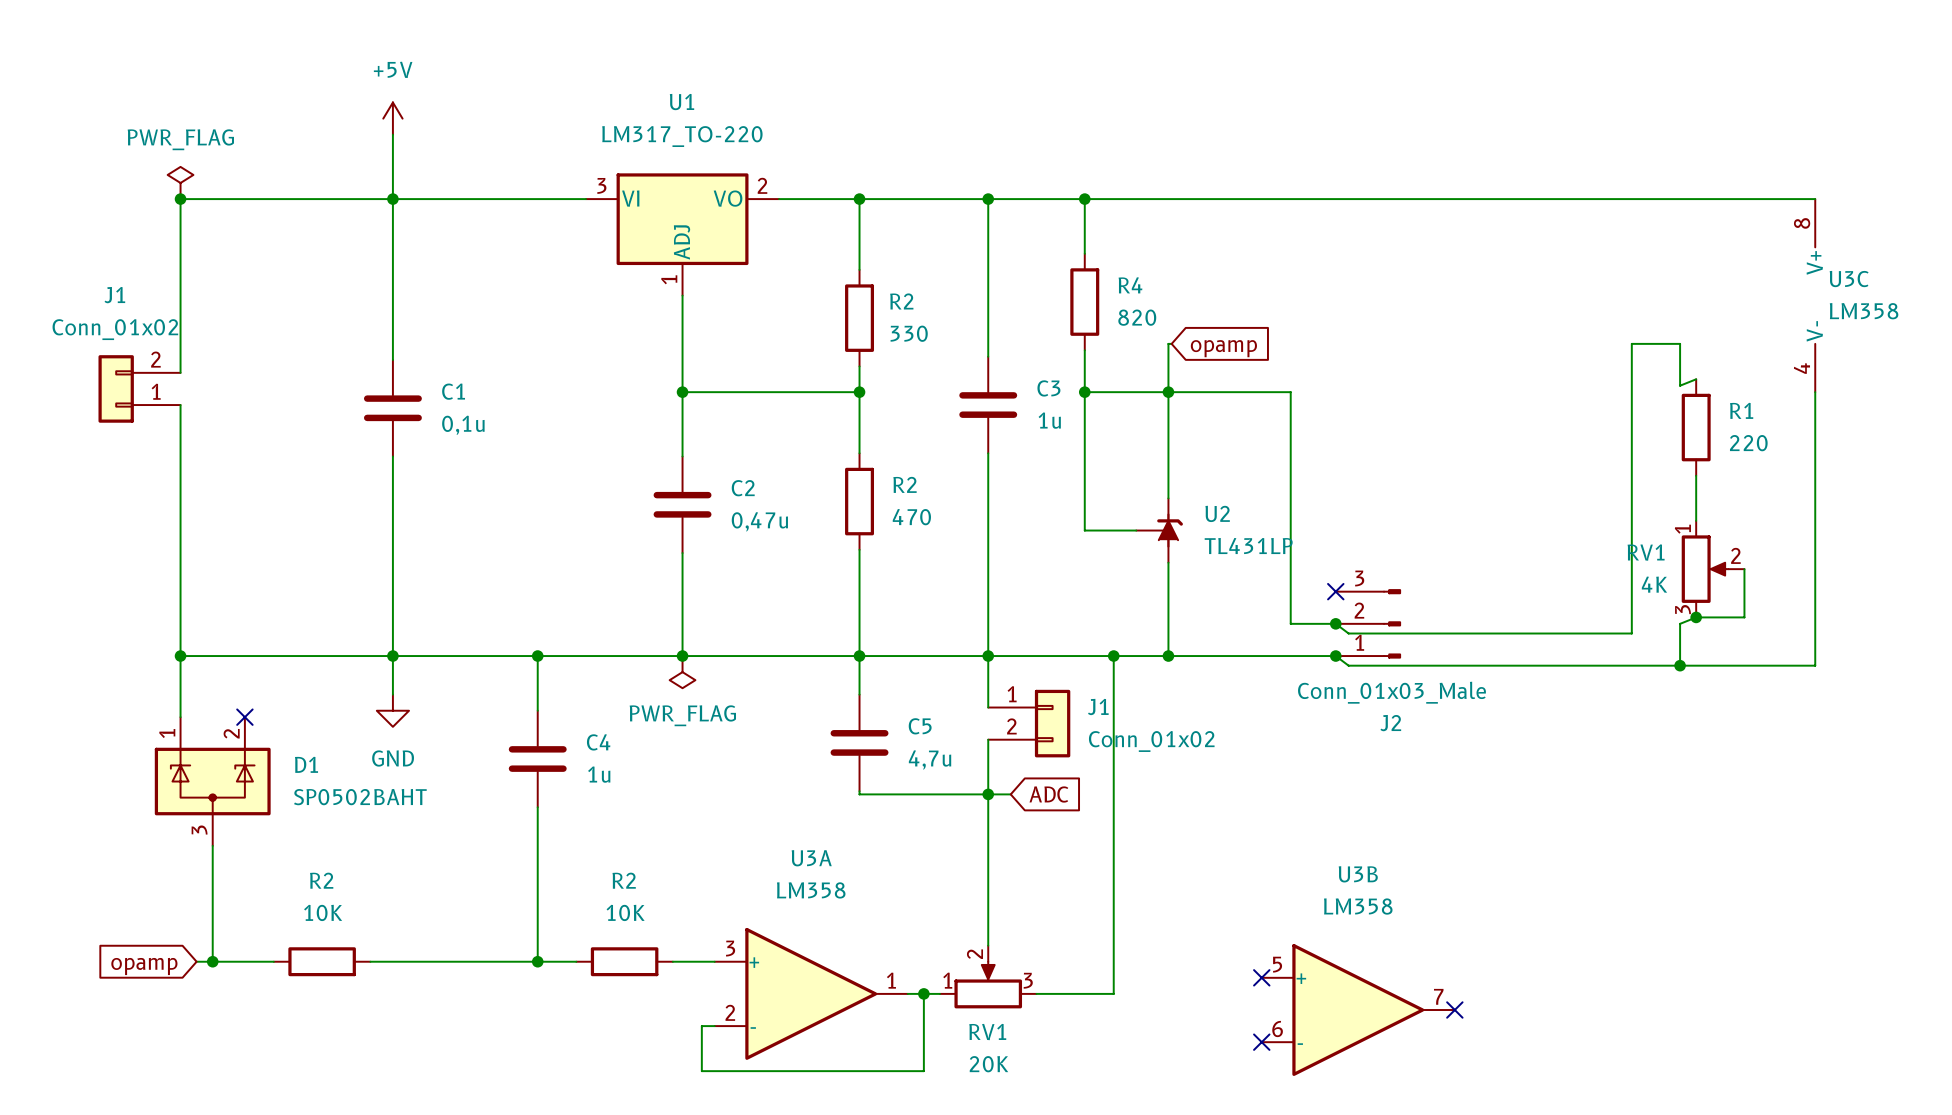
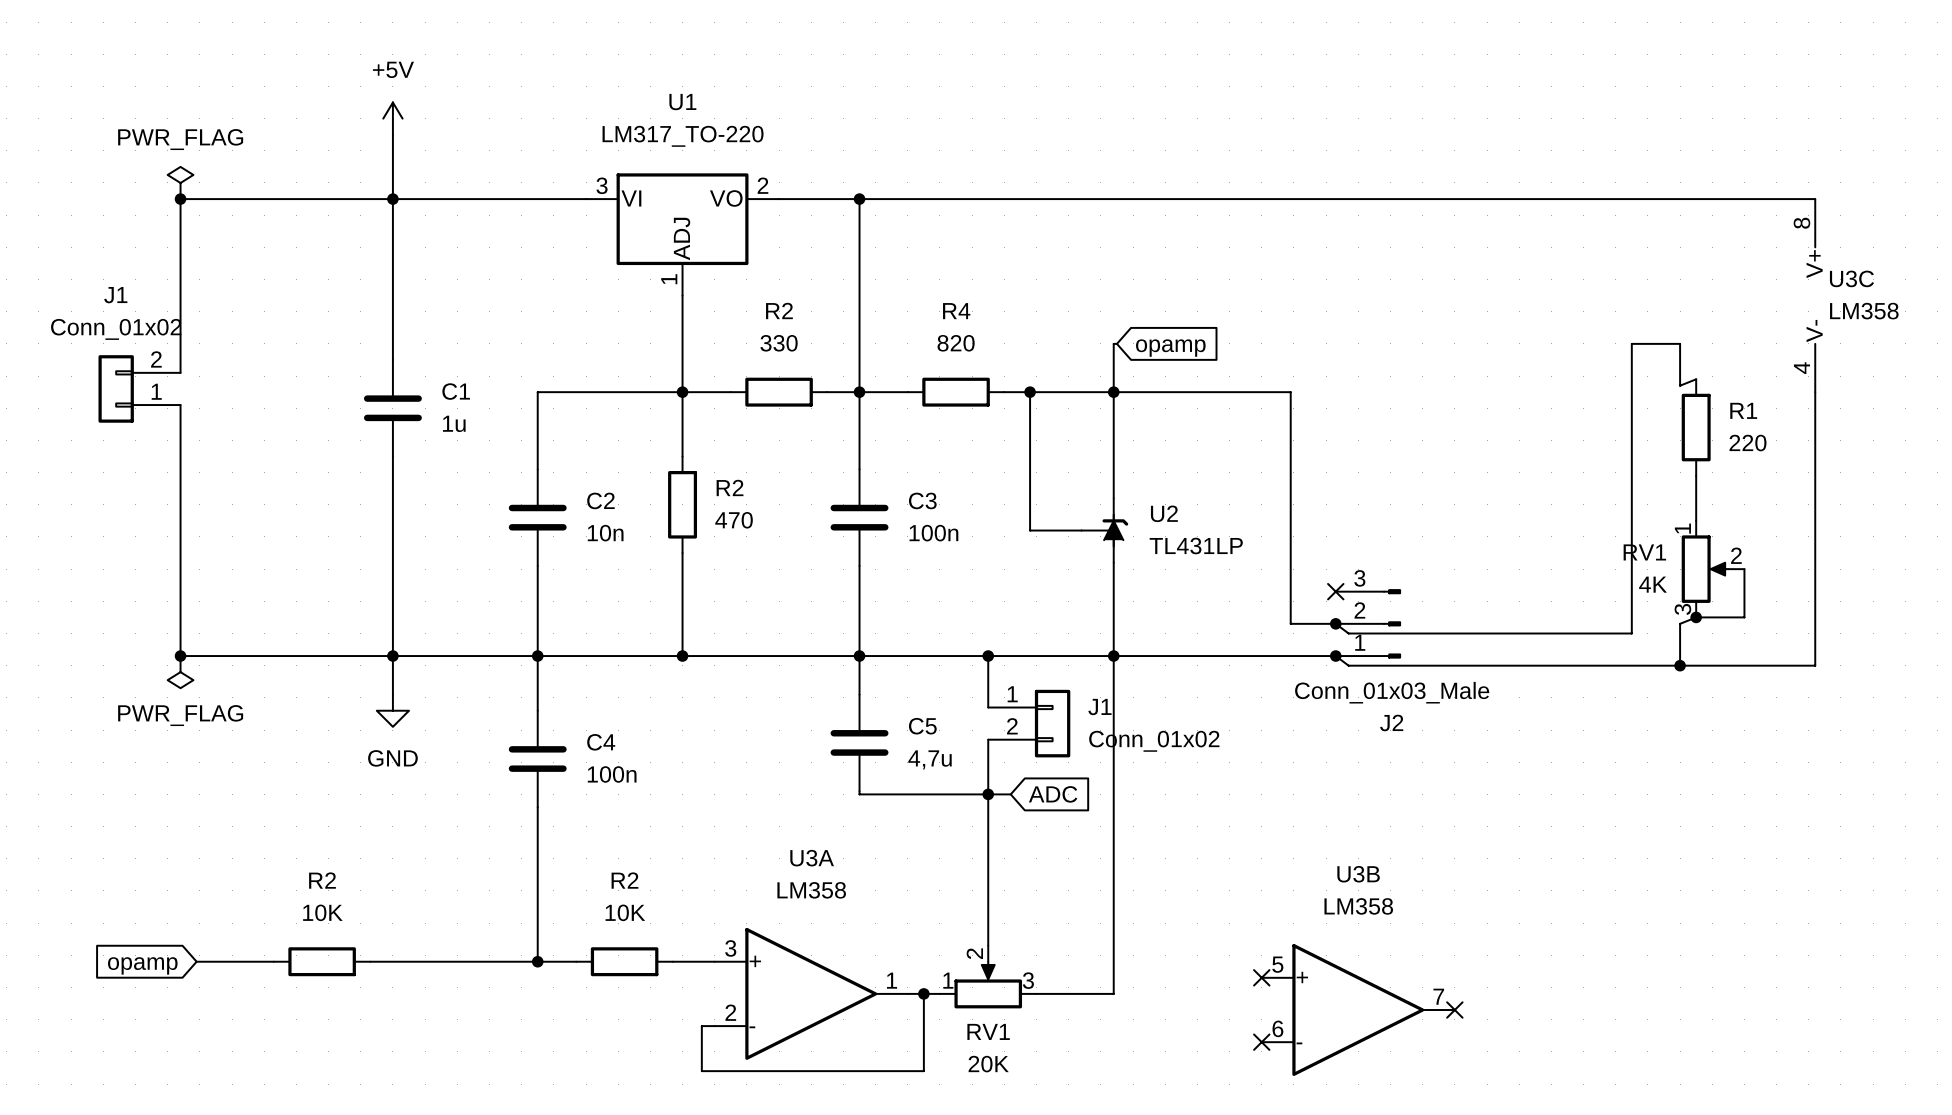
wire: (988, 199) (988, 356) -> none
junction: (988, 199) -> none
wire: (1084, 199) (1084, 253) -> none
junction: (1084, 199) -> none
wire: none -> (859, 269) (859, 366)
R4 name position: R4 (1130, 285) -> R4 (956, 311)
R2 name position: R2 (901, 301) -> R2 (779, 310)
R4 rotation: 0° (1084, 302) -> 90° clockwise (956, 392)
R4 position: (1084, 302) -> (956, 392)
R4 value position: 820 (1137, 317) -> 820 (956, 343)
R2 rotation: 0° (859, 318) -> 90° clockwise (779, 392)
R2 position: (859, 318) -> (779, 392)
R2 value position: 330 (909, 333) -> 330 (779, 343)
wire: (1171, 343) (1168, 343) (1168, 498) -> (1116, 343) (1113, 343) (1113, 498)
global label position: opamp (1223, 348) -> opamp (1170, 348)
wire: (1084, 350) (1084, 530) (1136, 530) -> none
wire: none -> (682, 392) (537, 392) (537, 469)
wire: (730, 392) (827, 392) -> none
wire: none -> (859, 392) (907, 392)
wire: none -> (1004, 392) (1084, 392)
wire: none -> (1030, 392) (1030, 530) (1081, 530)
junction: none -> (1030, 392)
junction: (1084, 392) -> none
junction: none -> (1113, 392)
junction: (1168, 392) -> none
C3 position: (988, 405) -> (859, 517)
C3 value: 1u (1049, 420) -> 100n (933, 533)
C1 value: 0,1u (463, 425) -> 1u (454, 423)
wire: (988, 453) (988, 656) -> none
R2 position: (859, 501) -> (682, 504)
C2 position: (682, 504) -> (537, 517)
C2 value: 0,47u (759, 521) -> 10n (605, 533)
U2 position: (1159, 530) -> (1104, 530)
wire: (1168, 562) (1168, 656) -> (1113, 562) (1113, 656)
wire: none -> (537, 565) (537, 656)
wire: (180, 656) (180, 717) -> none
junction: (1168, 656) -> none
power symbol: none -> PWR_FLAG (180, 672)
power symbol: PWR_FLAG (682, 672) -> none
no-connect mark: (244, 717) -> none
C4 value: 1u (599, 774) -> 100n (612, 774)
D1: SP0502BAHT (212, 781) -> none
wire: (212, 845) (212, 961) -> none
junction: (212, 961) -> none

